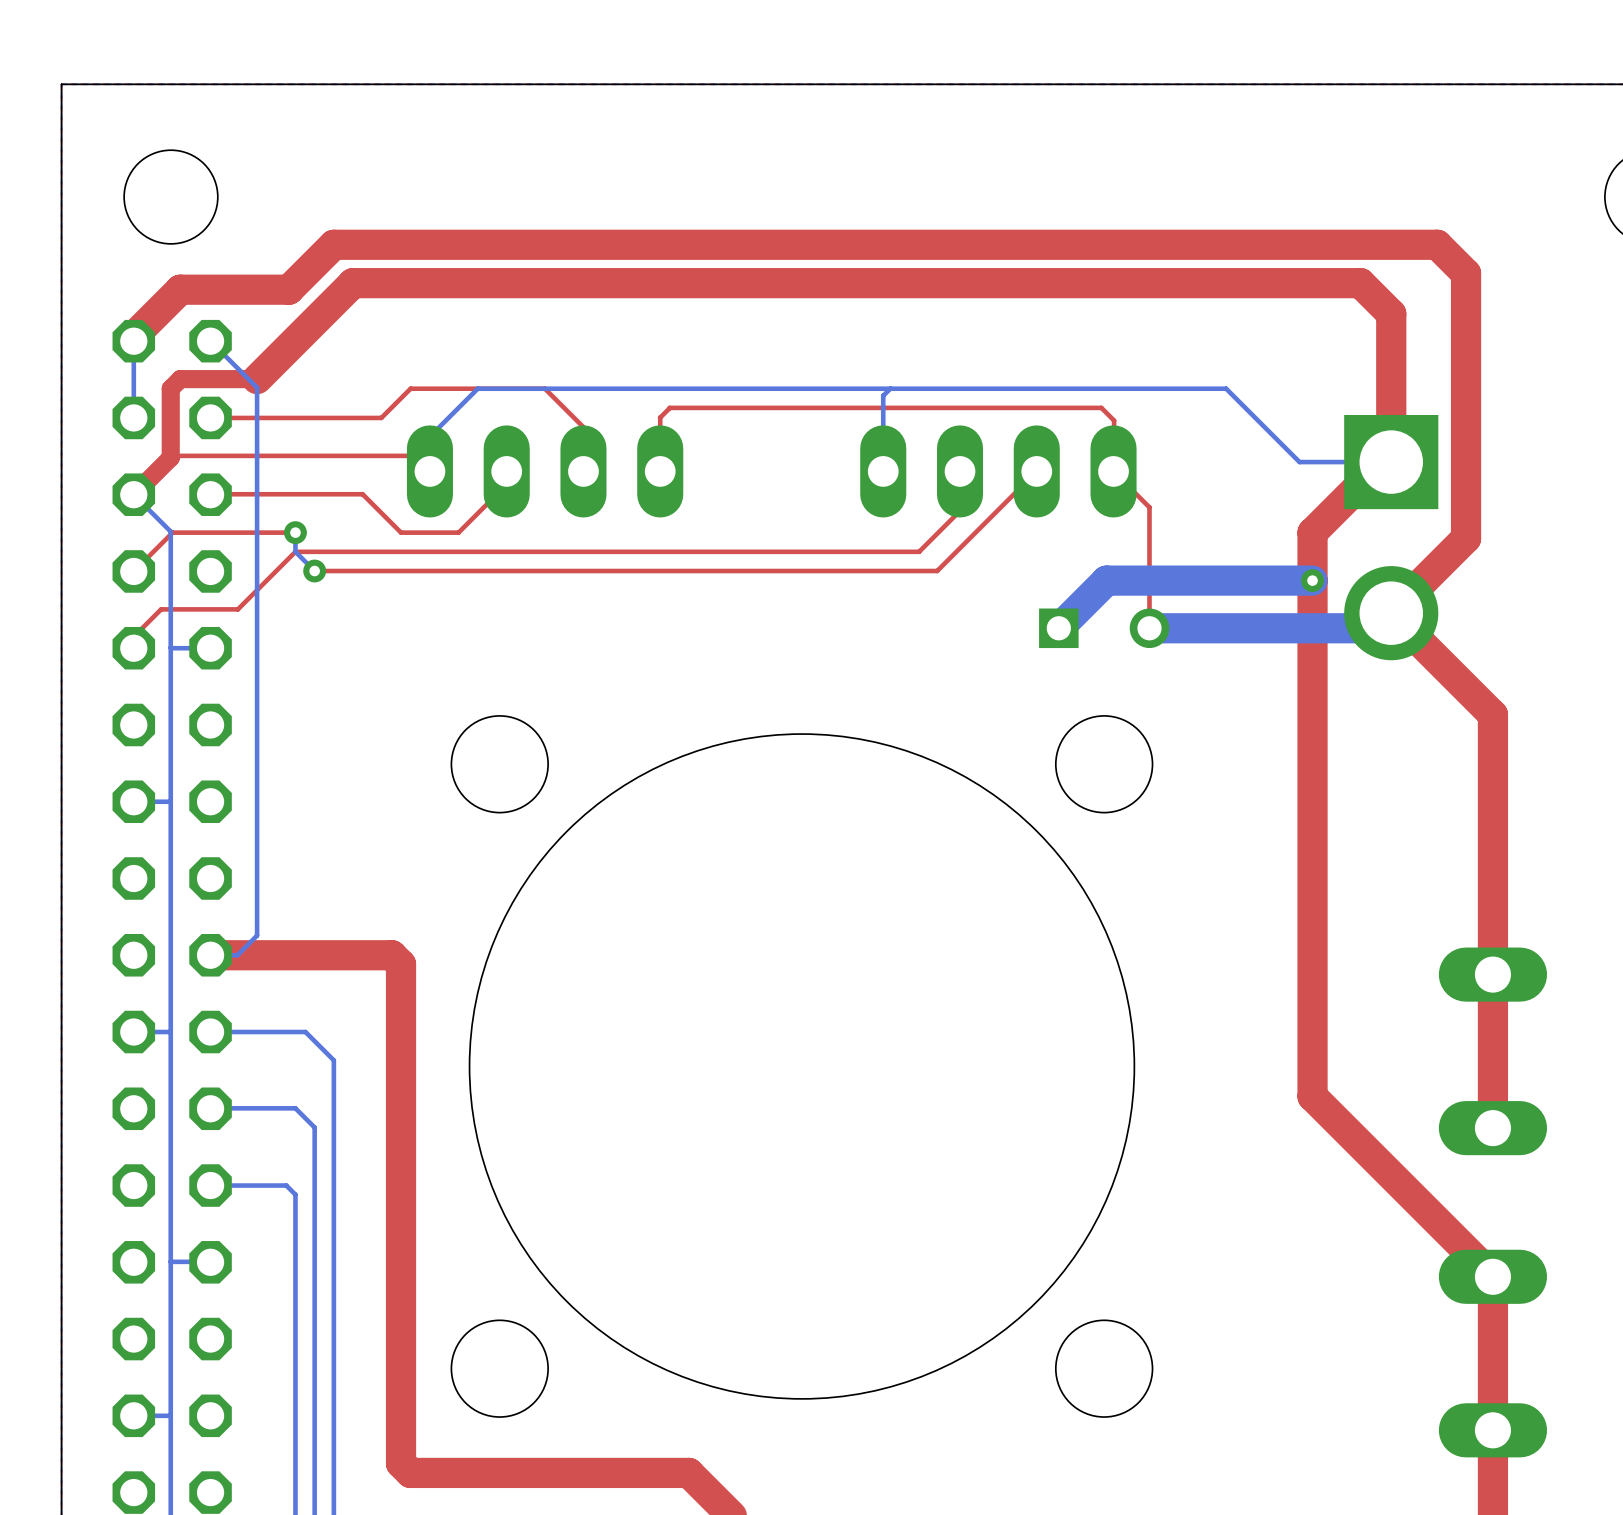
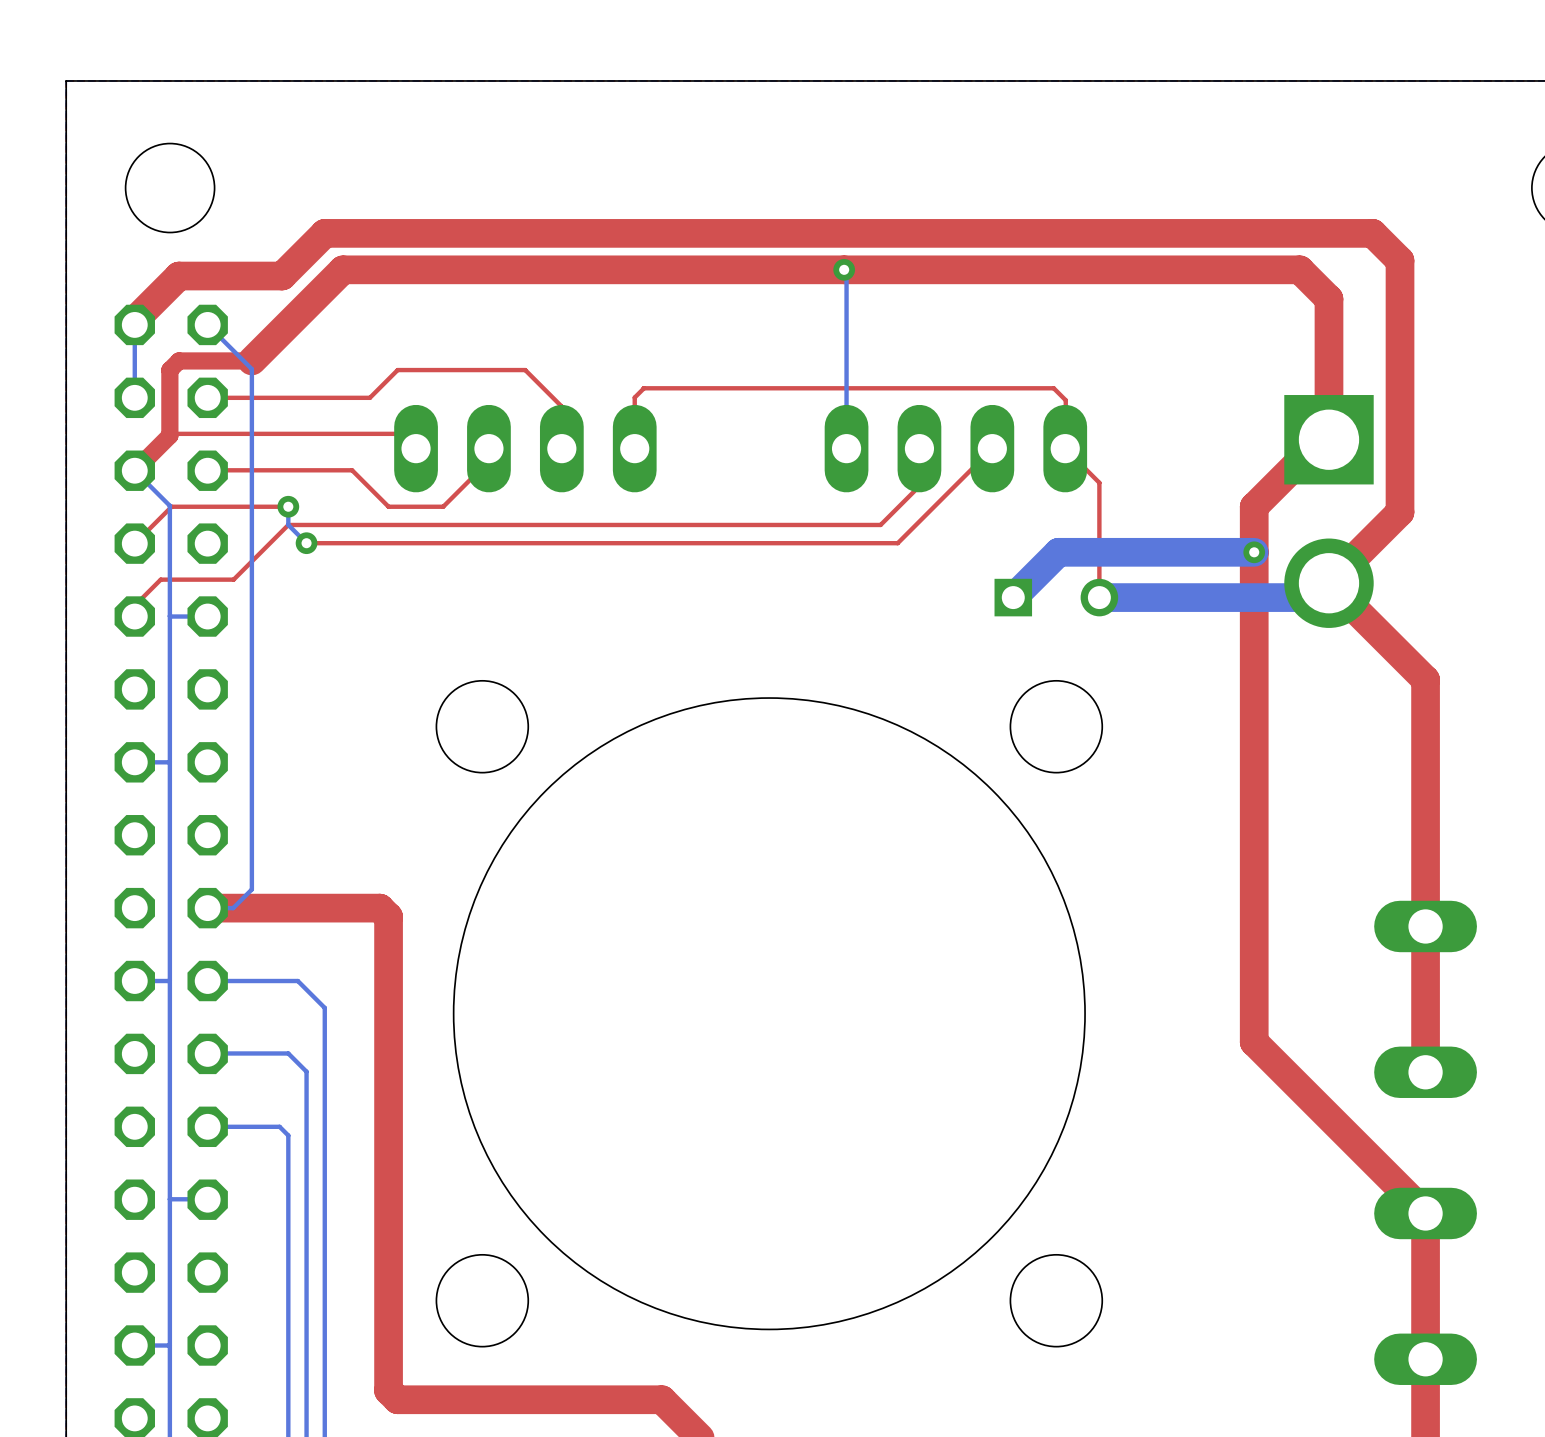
via: none -> (844, 269)
bottom track: (890, 388) (883, 395) -> (844, 269) (846, 272) (846, 376)
bottom track: (1391, 462) (1299, 462) (1226, 388) (477, 388) (429, 436) (429, 471) -> none

